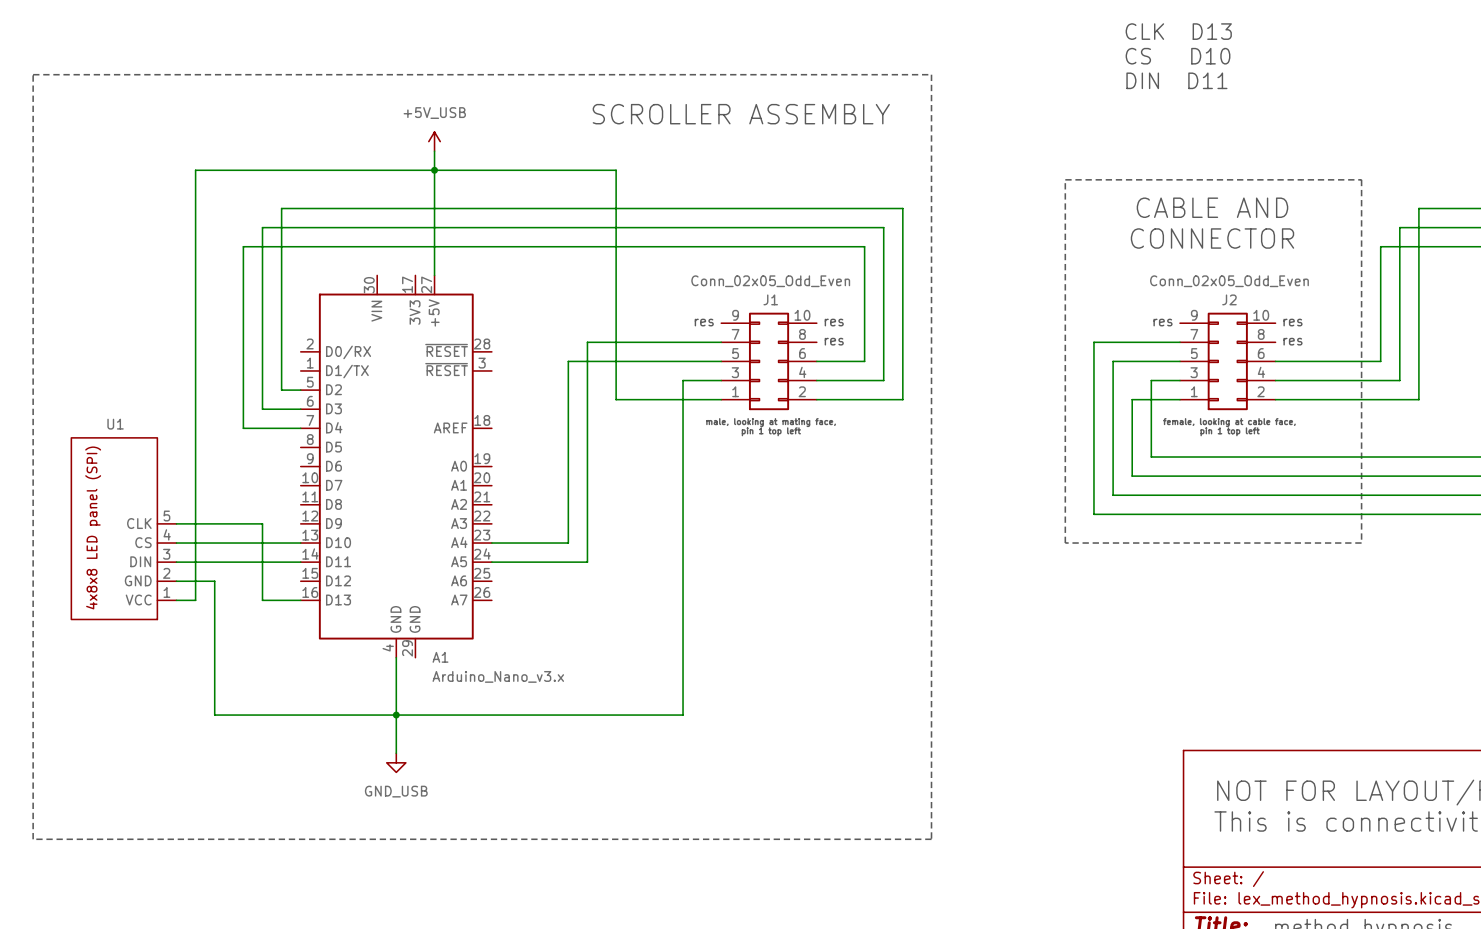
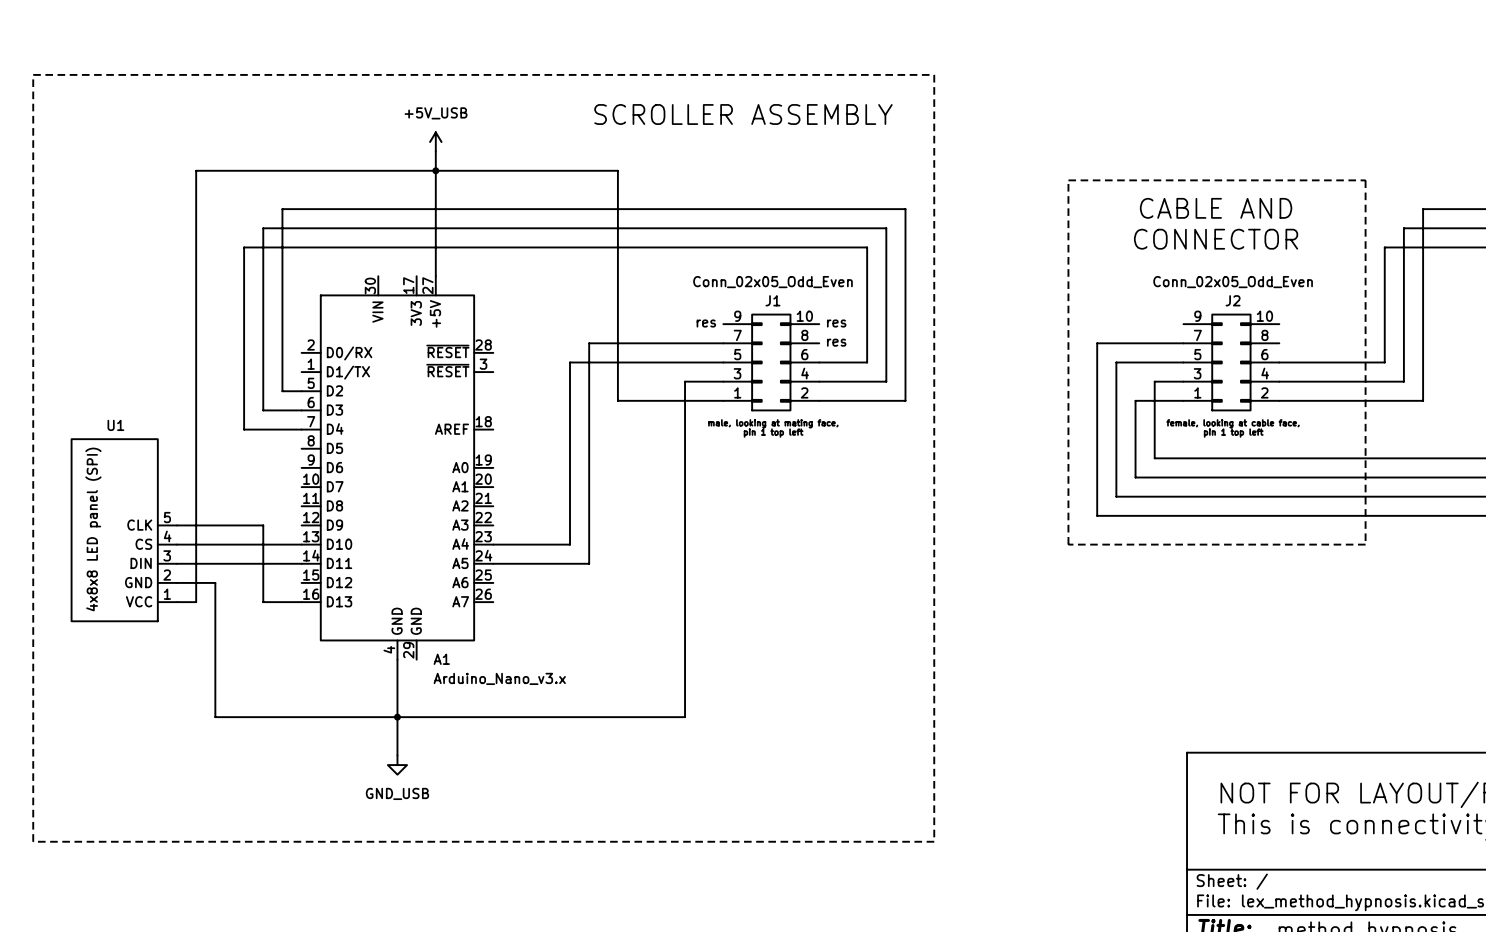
text: CLK D13 (1178, 31) -> none
text: CS D10 (1178, 56) -> none
text: DIN D11 (1176, 80) -> none
text: res (1163, 322) -> none
text: res (1292, 322) -> none
text: res (1292, 341) -> none

